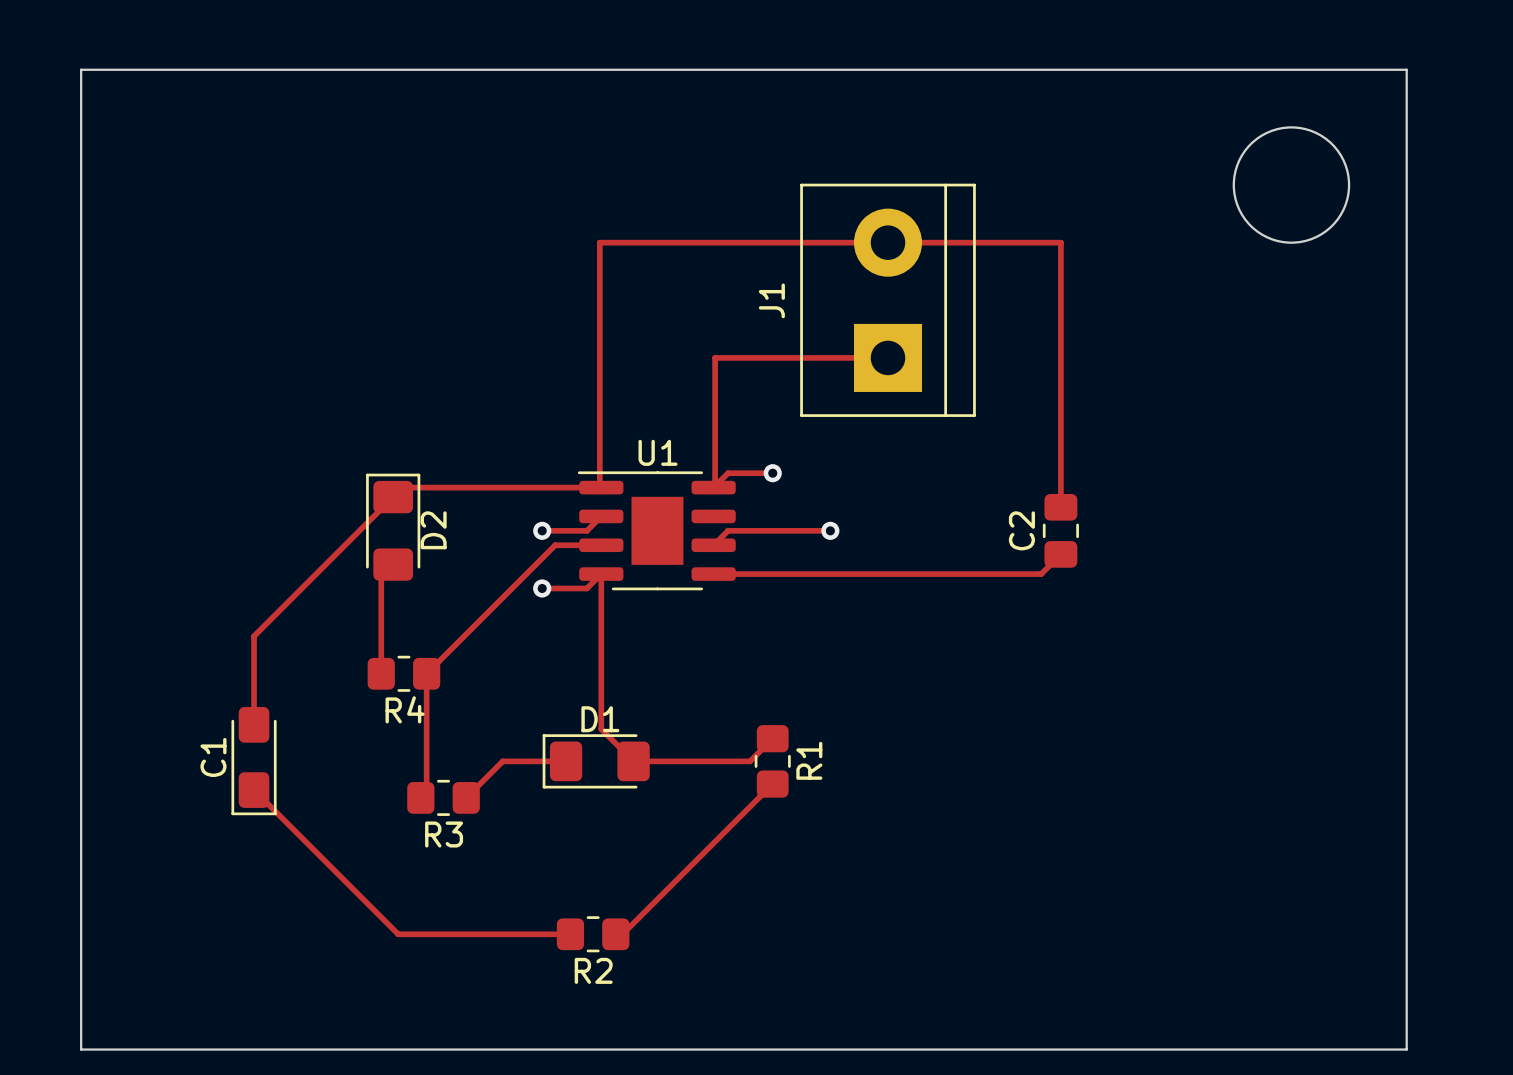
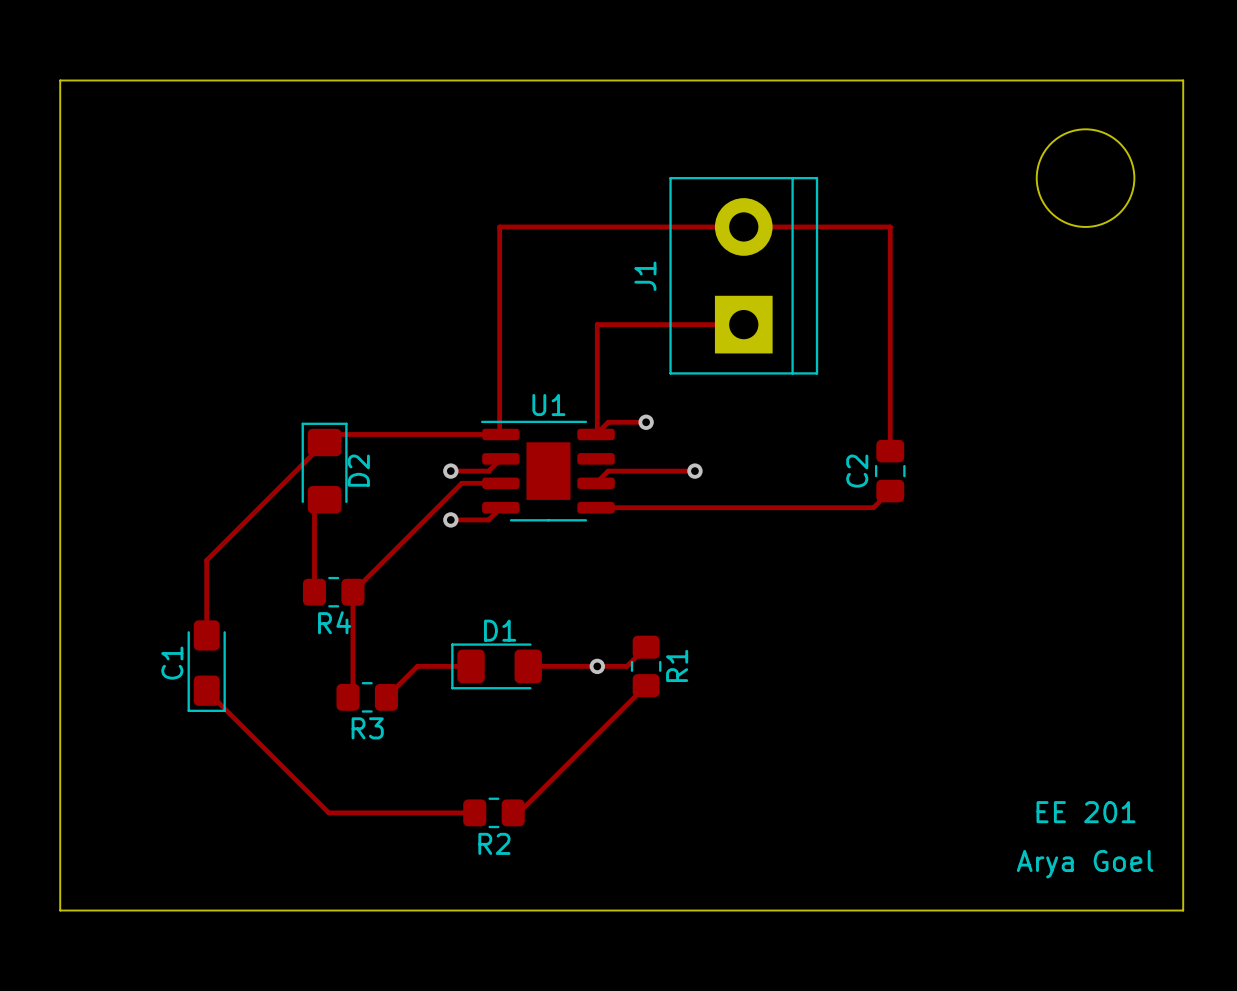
track: (601, 574) (601, 729) (633, 761) -> none
via: none -> (597, 666)
text: none -> EE 201 (1086, 812)
text: none -> Arya Goel (1085, 864)

